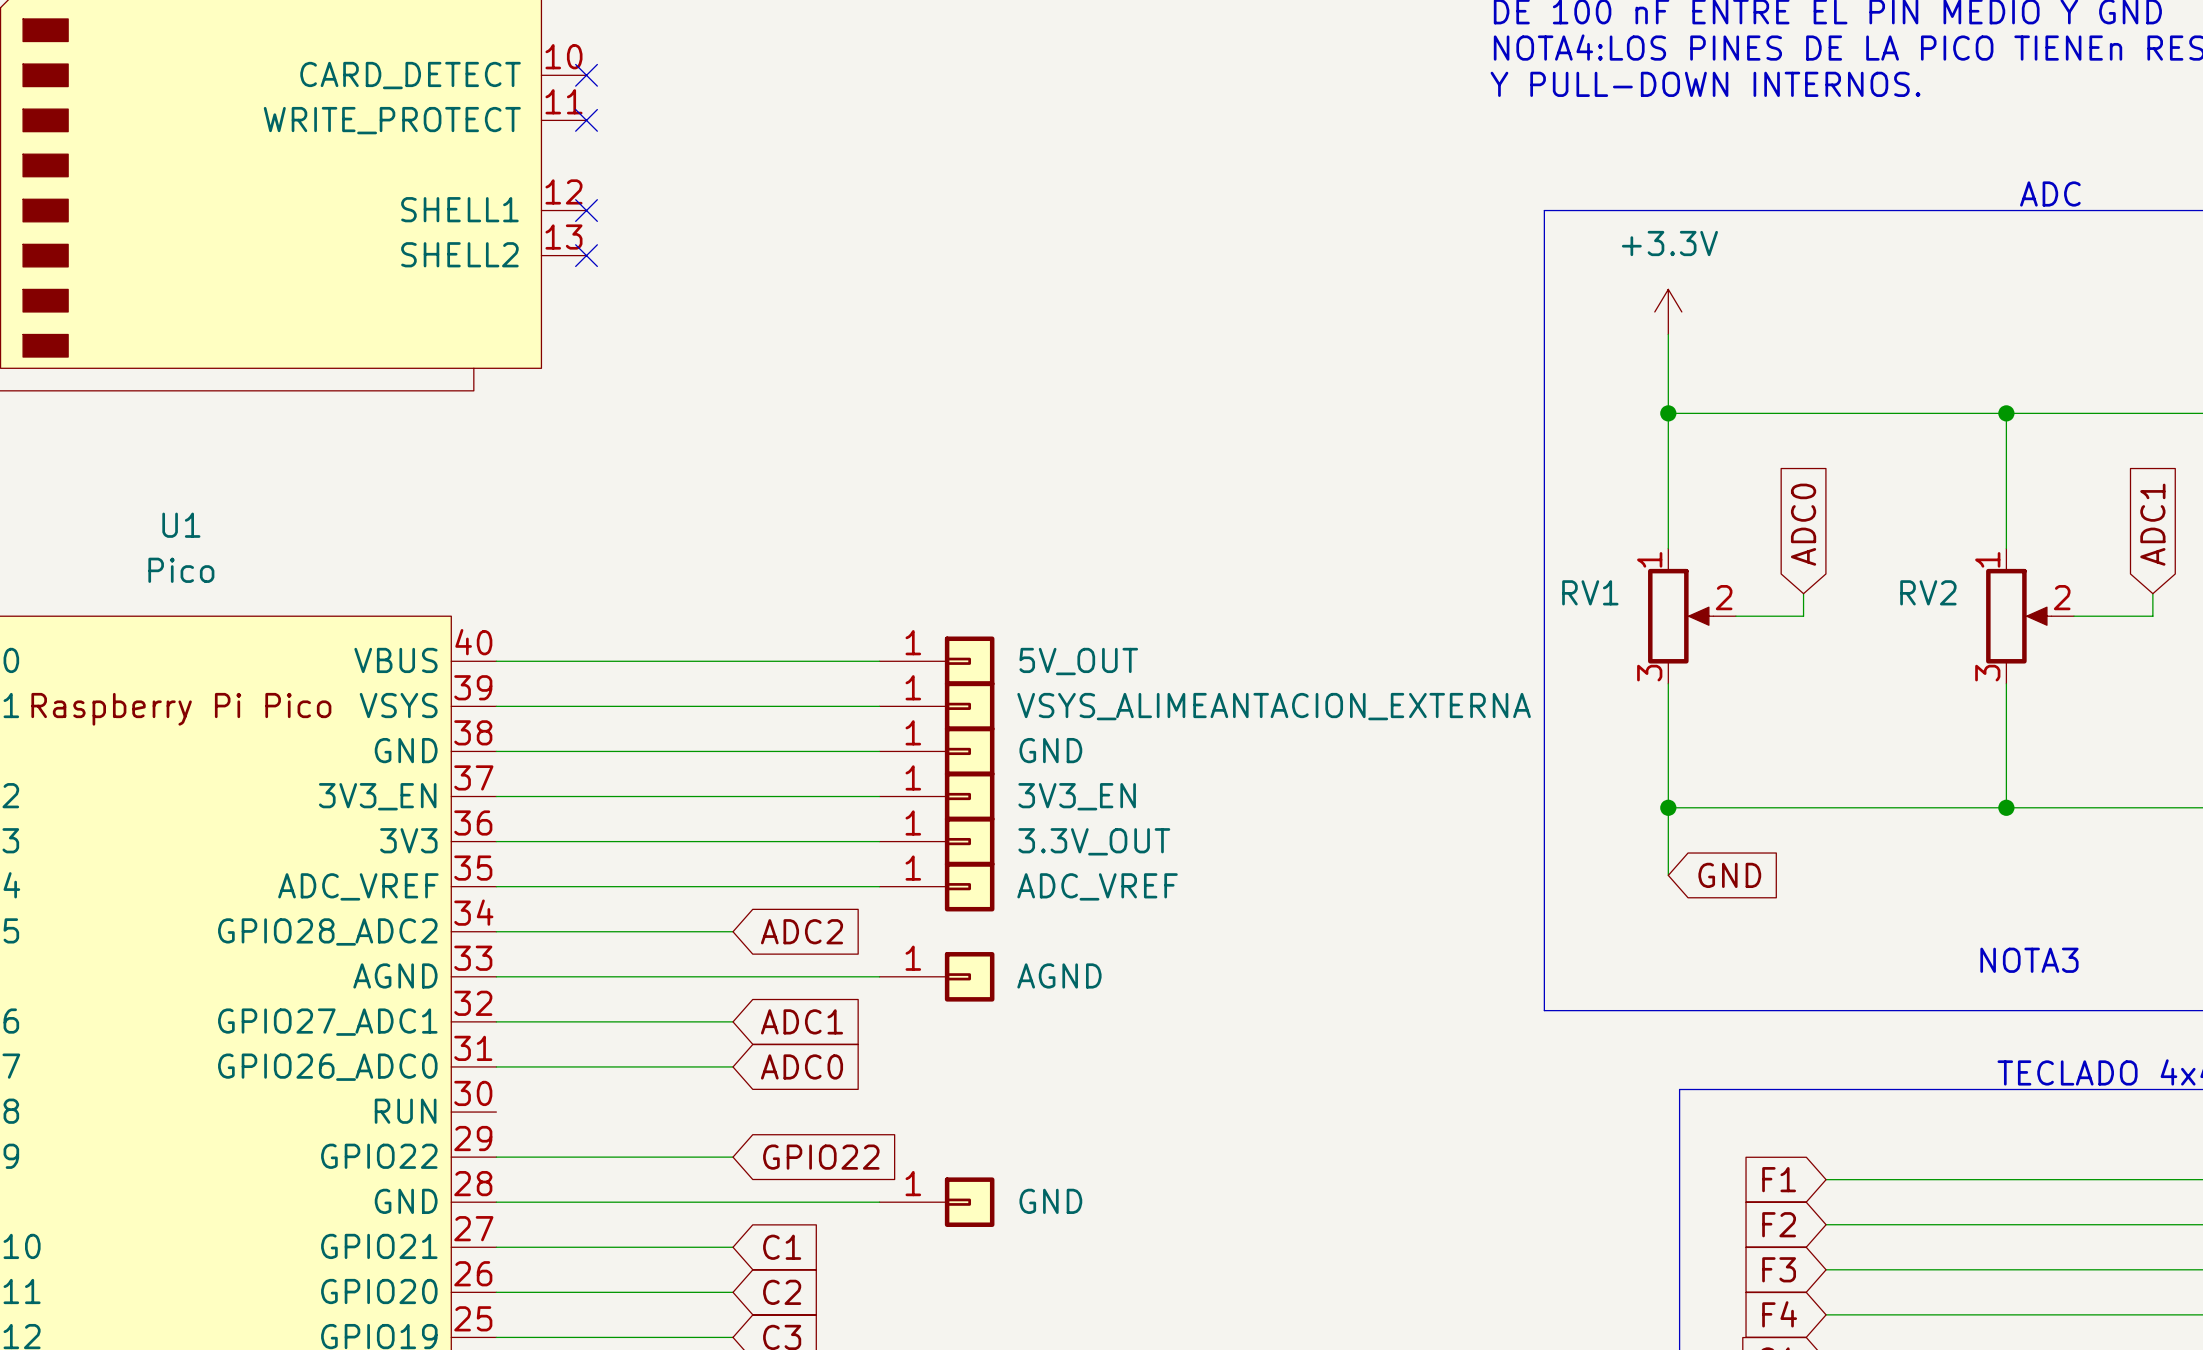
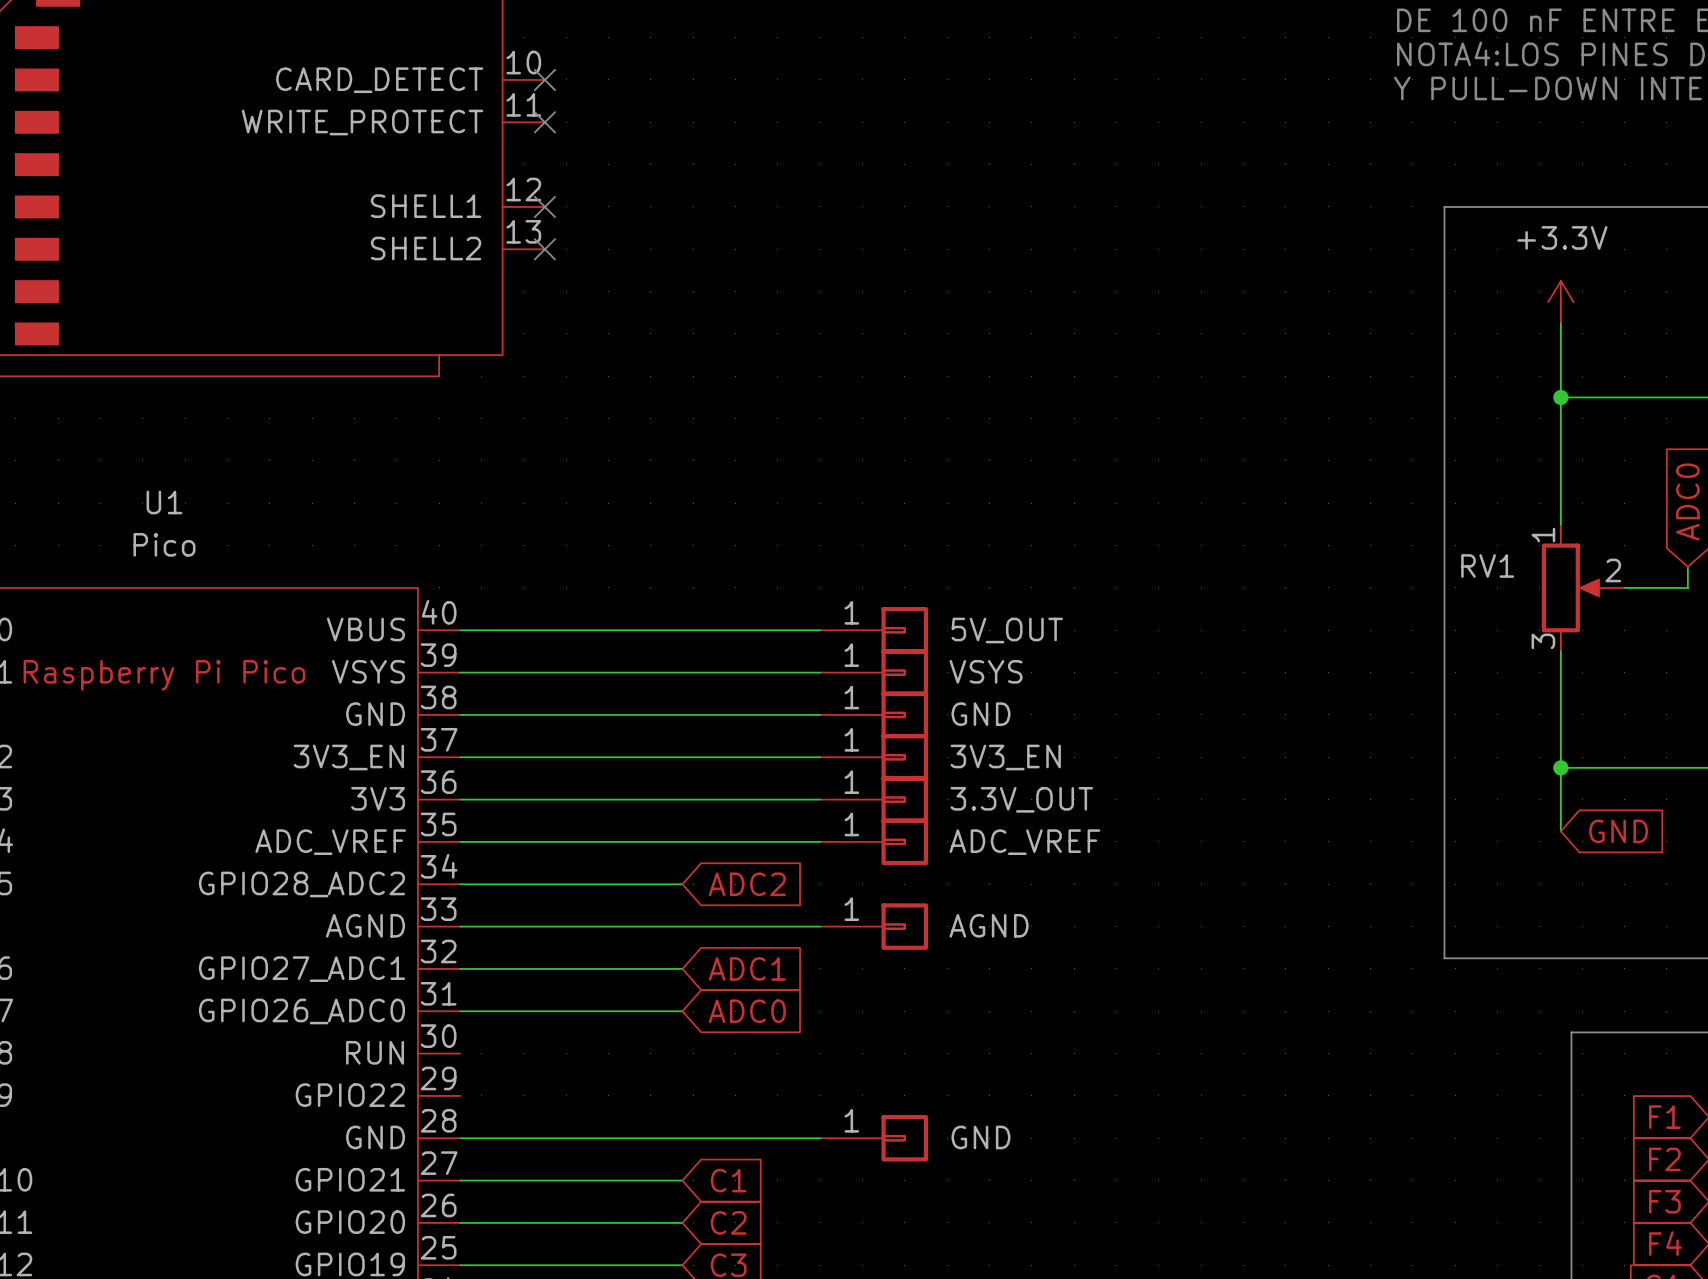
part value: VSYS_ALIMEANTACION_EXTERNA (1274, 706) -> VSYS (986, 671)
wire: (496, 1157) (733, 1157) -> none
global label: GPIO22 (821, 1157) -> none

